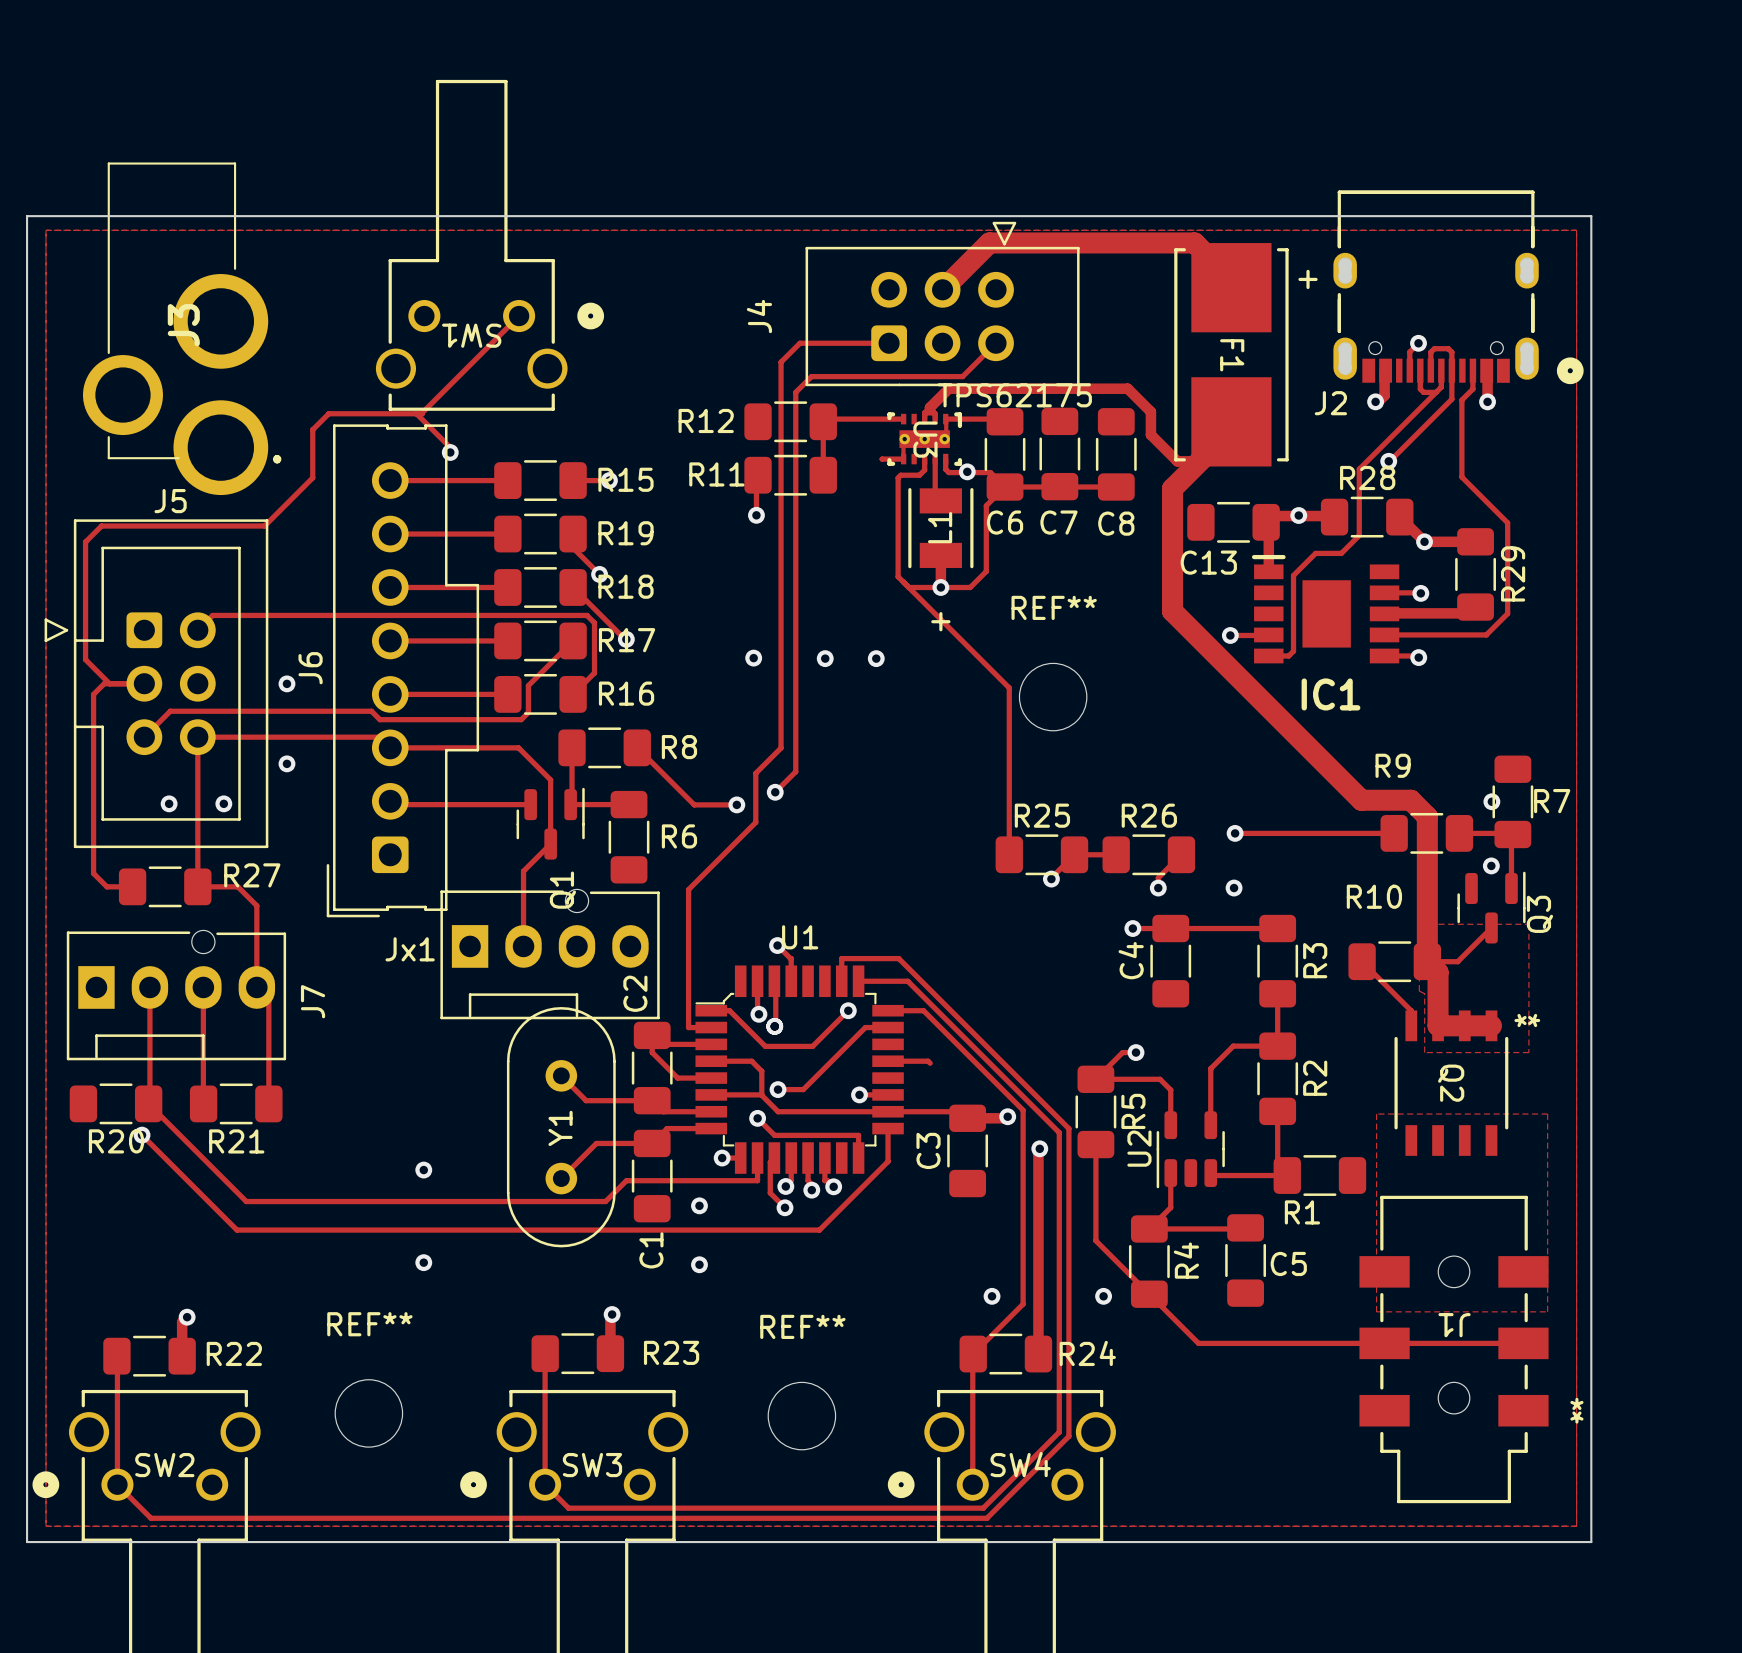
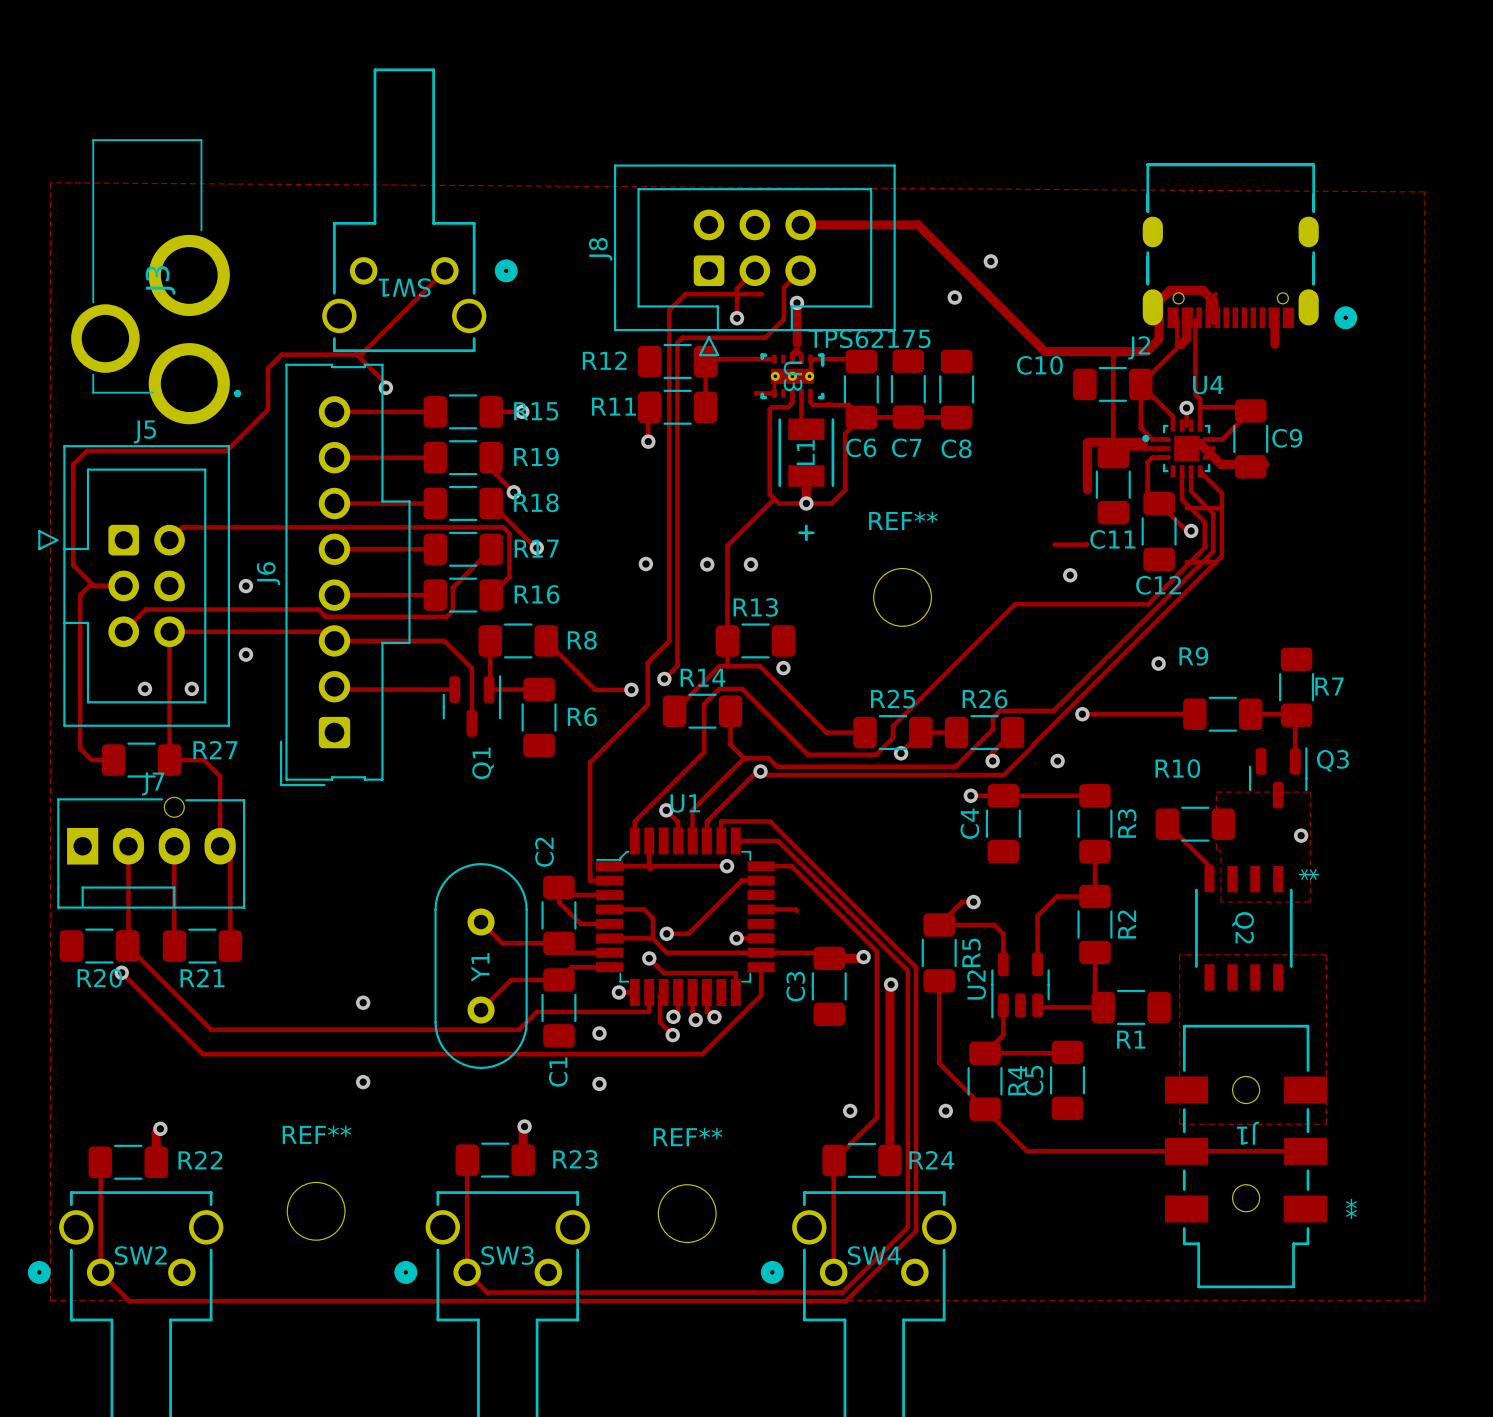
board edge: (27, 216) (1591, 216) (1591, 1542) (27, 1542) (27, 216) -> none
zone outline: (45, 230) (45, 1526) (1576, 1526) (1576, 230) (45, 230) -> (50, 182) (50, 1300) (1424, 1300) (1424, 191) (50, 182)
track: none -> (800, 224) (918, 224) (1044, 351) (1146, 351) (1159, 339) (1159, 301) (1170, 290) (1202, 290) (1213, 301) (1213, 320)
track: (1231, 287) (1231, 279) (1194, 242) (989, 242) (942, 289) -> none
J8: none -> (754, 260)
J4: (942, 304) -> none
via: none -> (990, 261)
track: none -> (754, 270) (737, 288) (737, 318)
track: (996, 343) (962, 376) (811, 376) (795, 392) (795, 771) (790, 777) -> (800, 270) (783, 287) (783, 319) (765, 337) (682, 337) (677, 342) (677, 665)
via: (1418, 343) -> none
via: none -> (954, 297)
via: none -> (796, 302)
track: none -> (797, 304) (797, 343)
F1: (1245, 354) -> none
track: (1420, 370) (1420, 389) (1423, 392) (1436, 392) -> none
track: (1430, 370) (1430, 352) (1434, 348) (1448, 348) (1451, 352) (1451, 399) (1388, 461) -> none
track: (1441, 370) (1441, 387) (1359, 469) (1359, 535) (1341, 553) (1315, 553) (1293, 575) (1293, 651) (1288, 656) (1268, 656) -> none
track: (1472, 370) (1472, 389) (1461, 400) (1461, 477) (1507, 522) (1507, 613) (1486, 634) (1384, 634) -> none
via: none -> (737, 318)
track: none -> (1177, 320) (1177, 347) (1140, 384)
track: none -> (1195, 320) (1195, 394) (1200, 399) (1200, 425)
via: (1375, 401) -> none
via: (1487, 401) -> none
track: (929, 409) (948, 388) (1127, 388) (1150, 411) (1150, 434) (1177, 461) (1192, 461) (1231, 421) (1231, 429) (1172, 488) (1172, 611) (1361, 800) (1410, 800) (1427, 816) (1427, 961) -> none
track: none -> (1118, 351) (1113, 357) (1113, 456) (1121, 448) (1164, 448)
C10: none -> (1112, 384)
track: none -> (1140, 384) (1140, 427) (1152, 439) (1164, 439)
track: none -> (1140, 384) (1173, 416) (1173, 425)
via position: (1388, 461) -> (1186, 407)
via: (967, 471) -> none
track: none -> (1200, 407) (1247, 407) (1250, 410) (1222, 439) (1208, 439)
track: none -> (1186, 407) (1186, 425)
C9: none -> (1250, 438)
via: (1298, 515) -> none
R28: (1367, 517) -> none
C13: (1233, 522) -> none
U4: none -> (1178, 448)
track: none -> (1164, 457) (1152, 457) (1147, 462) (1147, 492) (1186, 530) (1191, 530)
via: (1424, 541) -> none
track: none -> (1182, 471) (1182, 499) (1204, 522) (1204, 547) (1148, 604) (1014, 604) (892, 726) (892, 737) (876, 754) (807, 754) (742, 688) (719, 688) (704, 703) (704, 752) (634, 821) (634, 840)
track: none -> (1191, 471) (1191, 491) (1213, 513) (1213, 551) (1053, 710) (999, 710) (992, 717) (992, 729) (955, 766) (777, 766) (768, 758) (744, 758)
track: none -> (1200, 471) (1221, 493) (1221, 556) (1003, 775) (764, 775) (760, 771) (756, 771) (706, 821) (706, 840)
C11: none -> (1113, 484)
R29: (1475, 574) -> none
track: none -> (774, 498) (727, 545) (727, 666)
track: (908, 587) (1009, 687) (1009, 854) -> (674, 711) (719, 666) (760, 666) (826, 732) (864, 732)
via: (1420, 593) -> none
track: (1475, 607) (1469, 613) (1384, 613) -> none
IC1: (1325, 609) -> none
via: none -> (1191, 530)
C12: none -> (1159, 531)
via position: (1230, 635) -> (1070, 575)
via: (1418, 657) -> none
R13: none -> (755, 640)
via: none -> (1158, 663)
via: none -> (783, 668)
via: (1491, 801) -> none
R14: none -> (702, 711)
track: none -> (730, 711) (730, 744) (744, 758)
track: (1235, 833) (1262, 833) -> none
via position: (1235, 833) -> (1082, 714)
track: (550, 844) (523, 871) (523, 946) -> none
via: (1491, 865) -> none
track: none -> (744, 758) (692, 809) (692, 840)
via: none -> (760, 771)
Q3 name rotation: 0° (1539, 914) -> 90° clockwise (1332, 760)
track: (1491, 927) (1457, 961) (1427, 961) -> none
Jx1: (550, 954) -> none
track: (1427, 961) (1438, 972) (1438, 1025) (1491, 1025) -> none
via: none -> (1301, 835)
track: (774, 981) (775, 1024) (777, 1026) -> none
J7 name rotation: 0° (313, 1001) -> 90° clockwise (153, 784)
J7 name position: J7 (313, 1001) -> J7 (153, 784)
track: (729, 1010) (765, 1046) (812, 1046) (848, 1010) -> (625, 866) (727, 866)
via: (758, 1014) -> none
via: (774, 1026) -> none
R1 name position: R1 (1302, 1212) -> R1 (1131, 1039)
C5 name rotation: 0° (1288, 1263) -> 90° counterclockwise (1034, 1080)
C5 name position: C5 (1288, 1263) -> C5 (1034, 1080)

